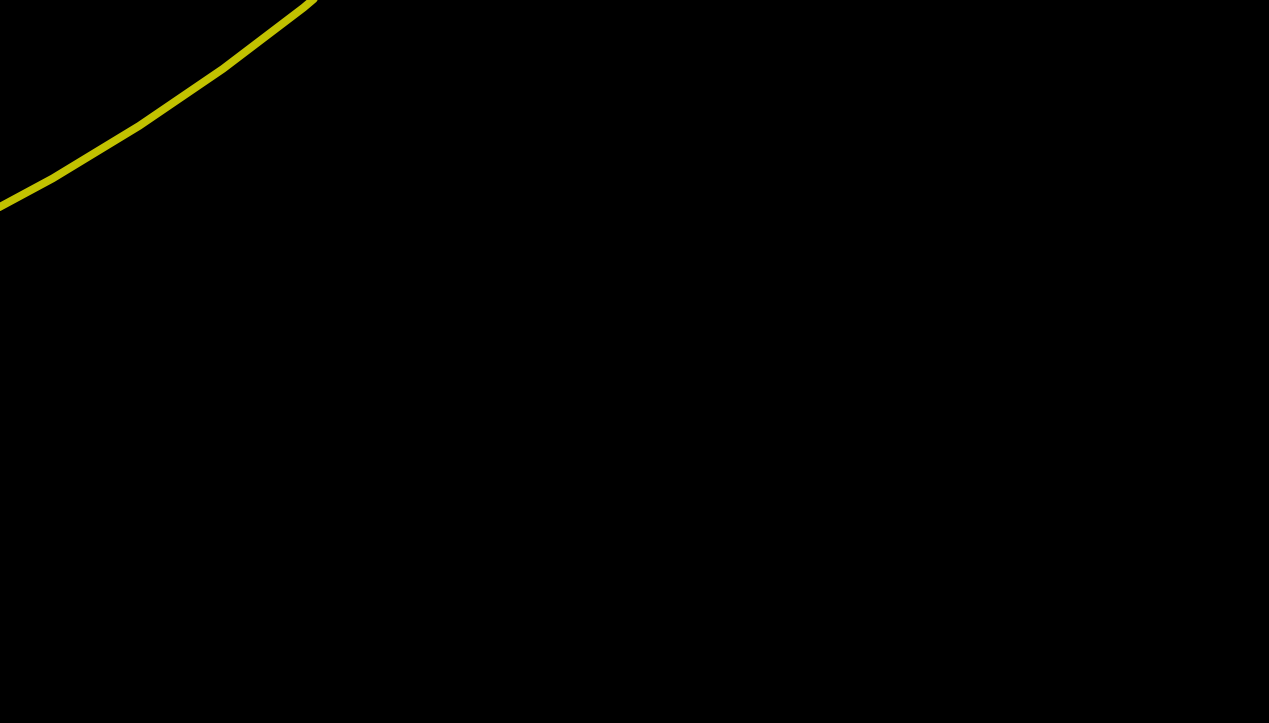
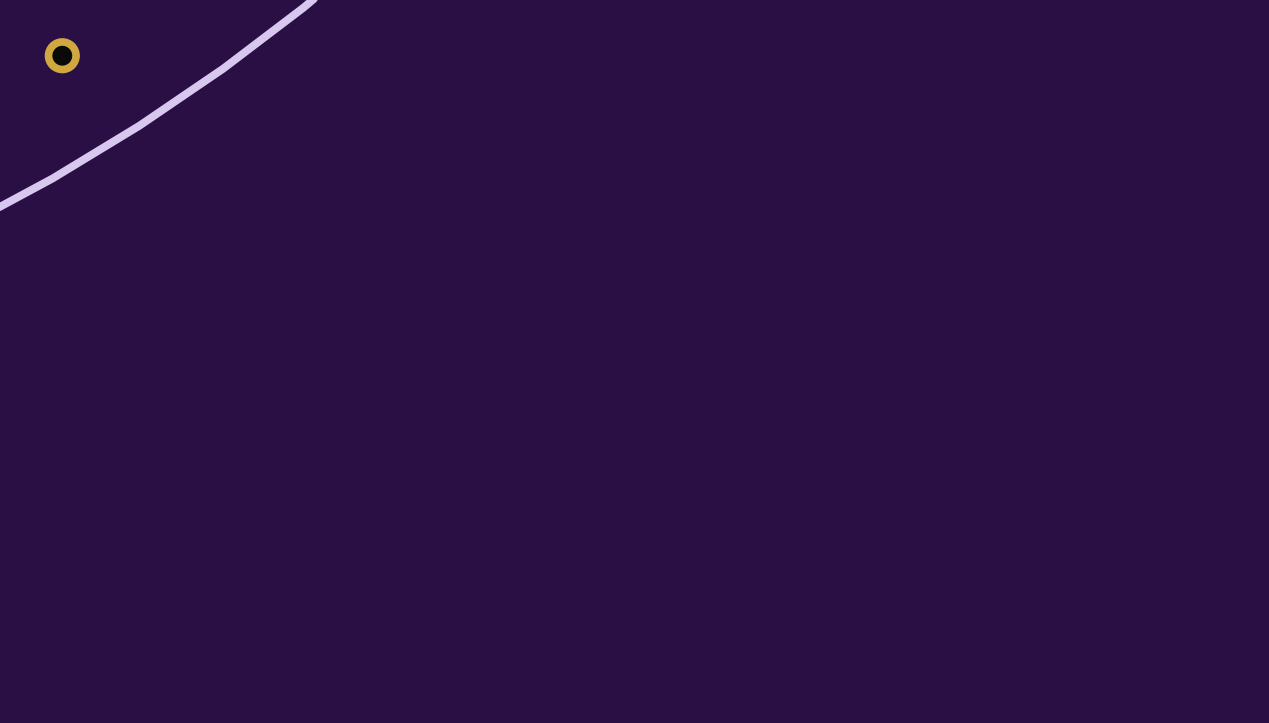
via: none -> (62, 55)

